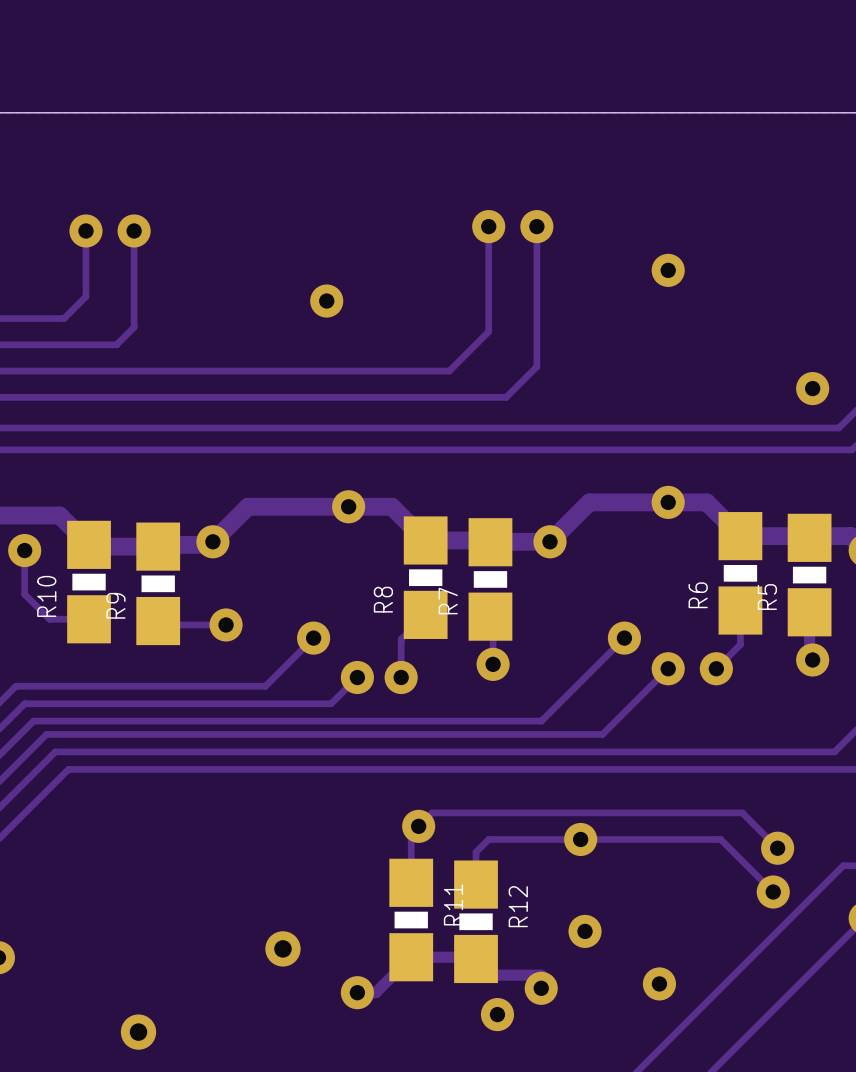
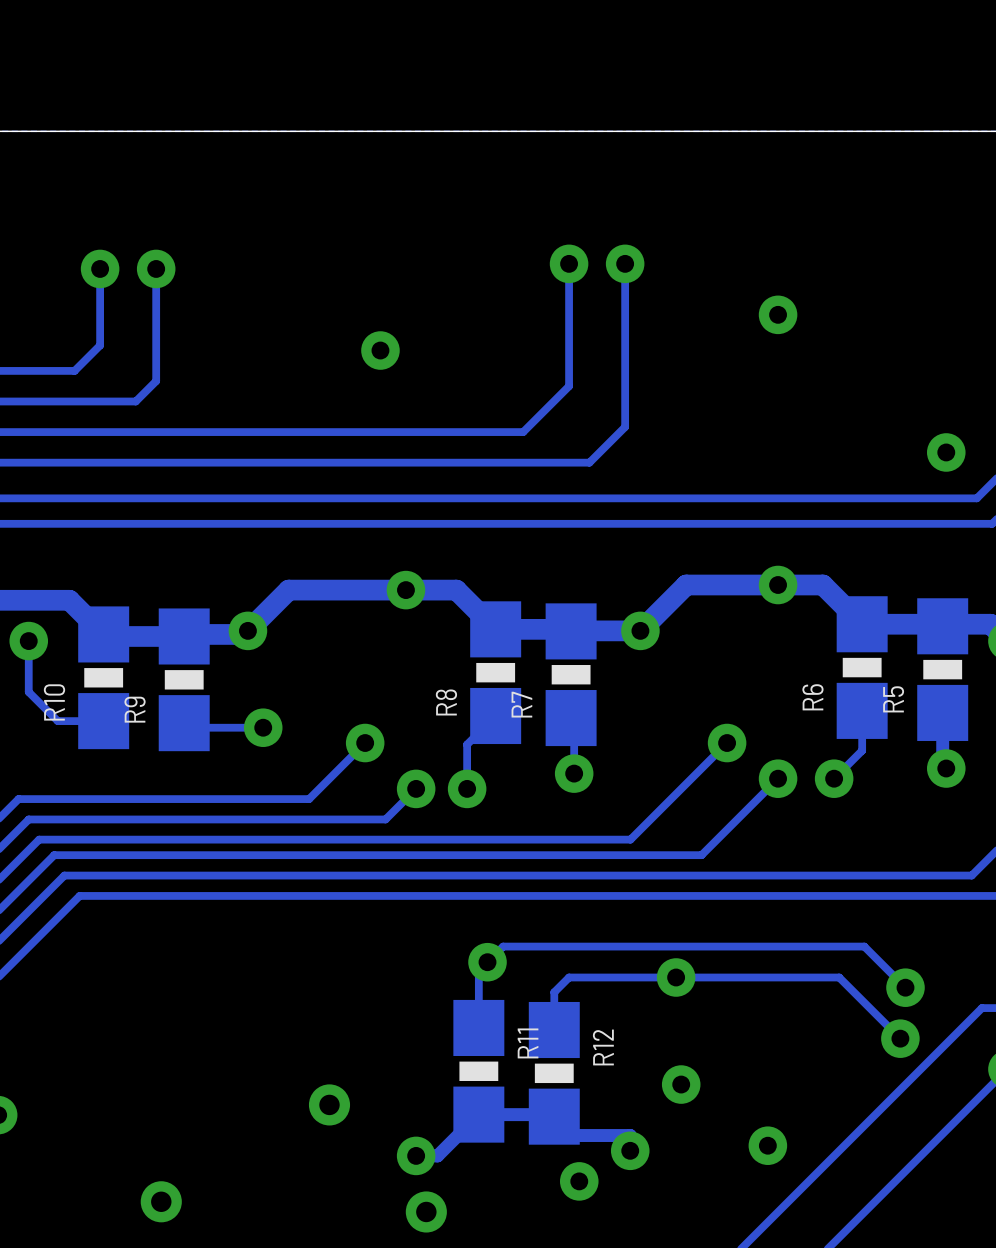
via: none -> (426, 1211)

